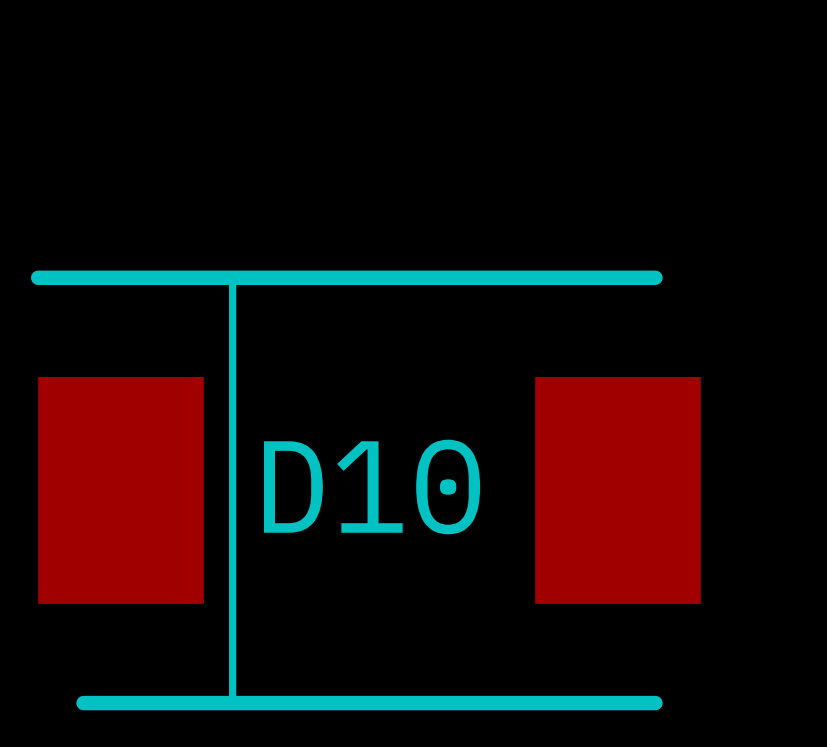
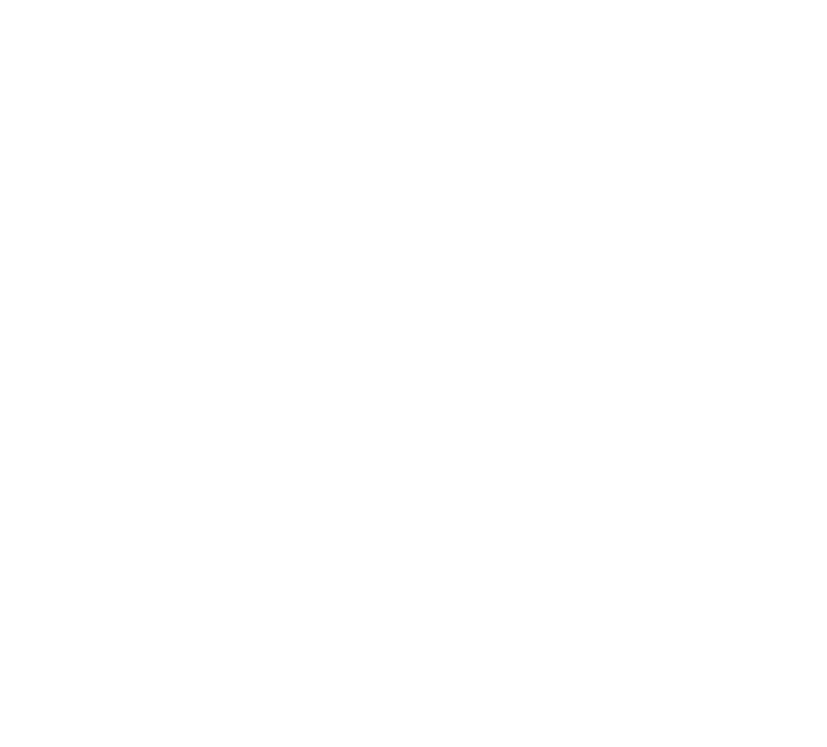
D10: (365, 490) -> none

